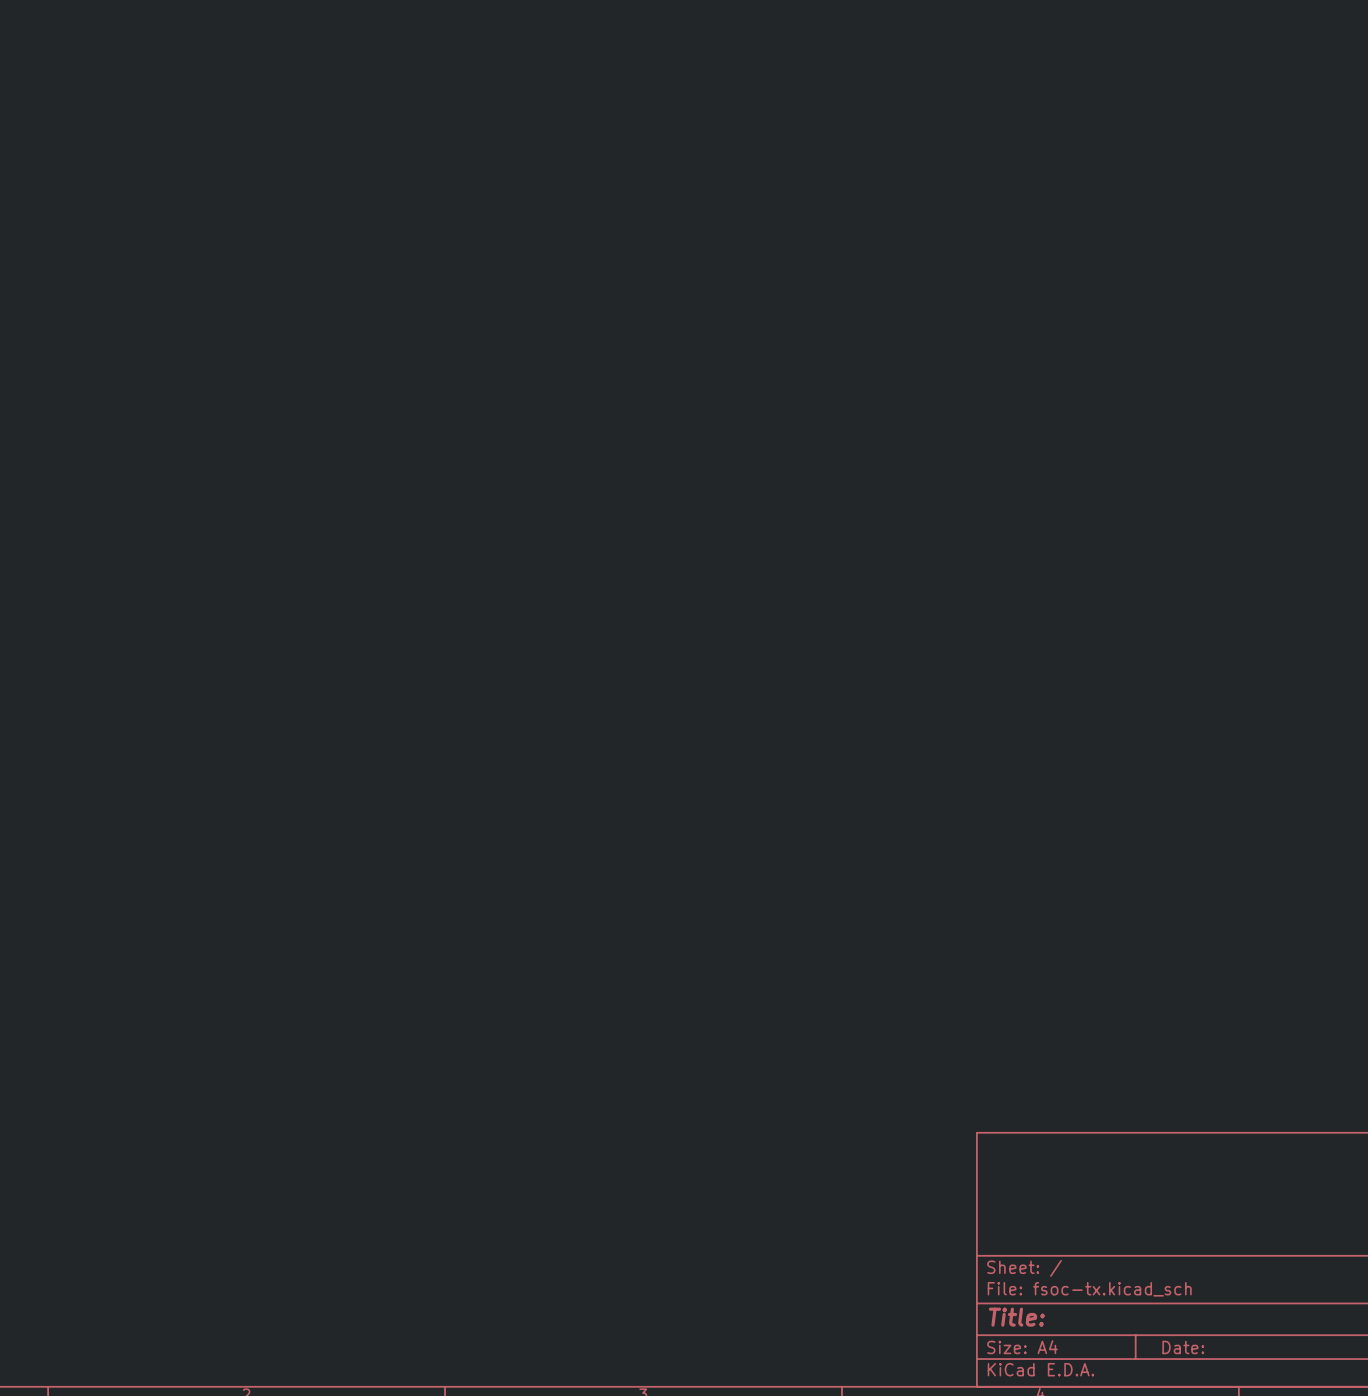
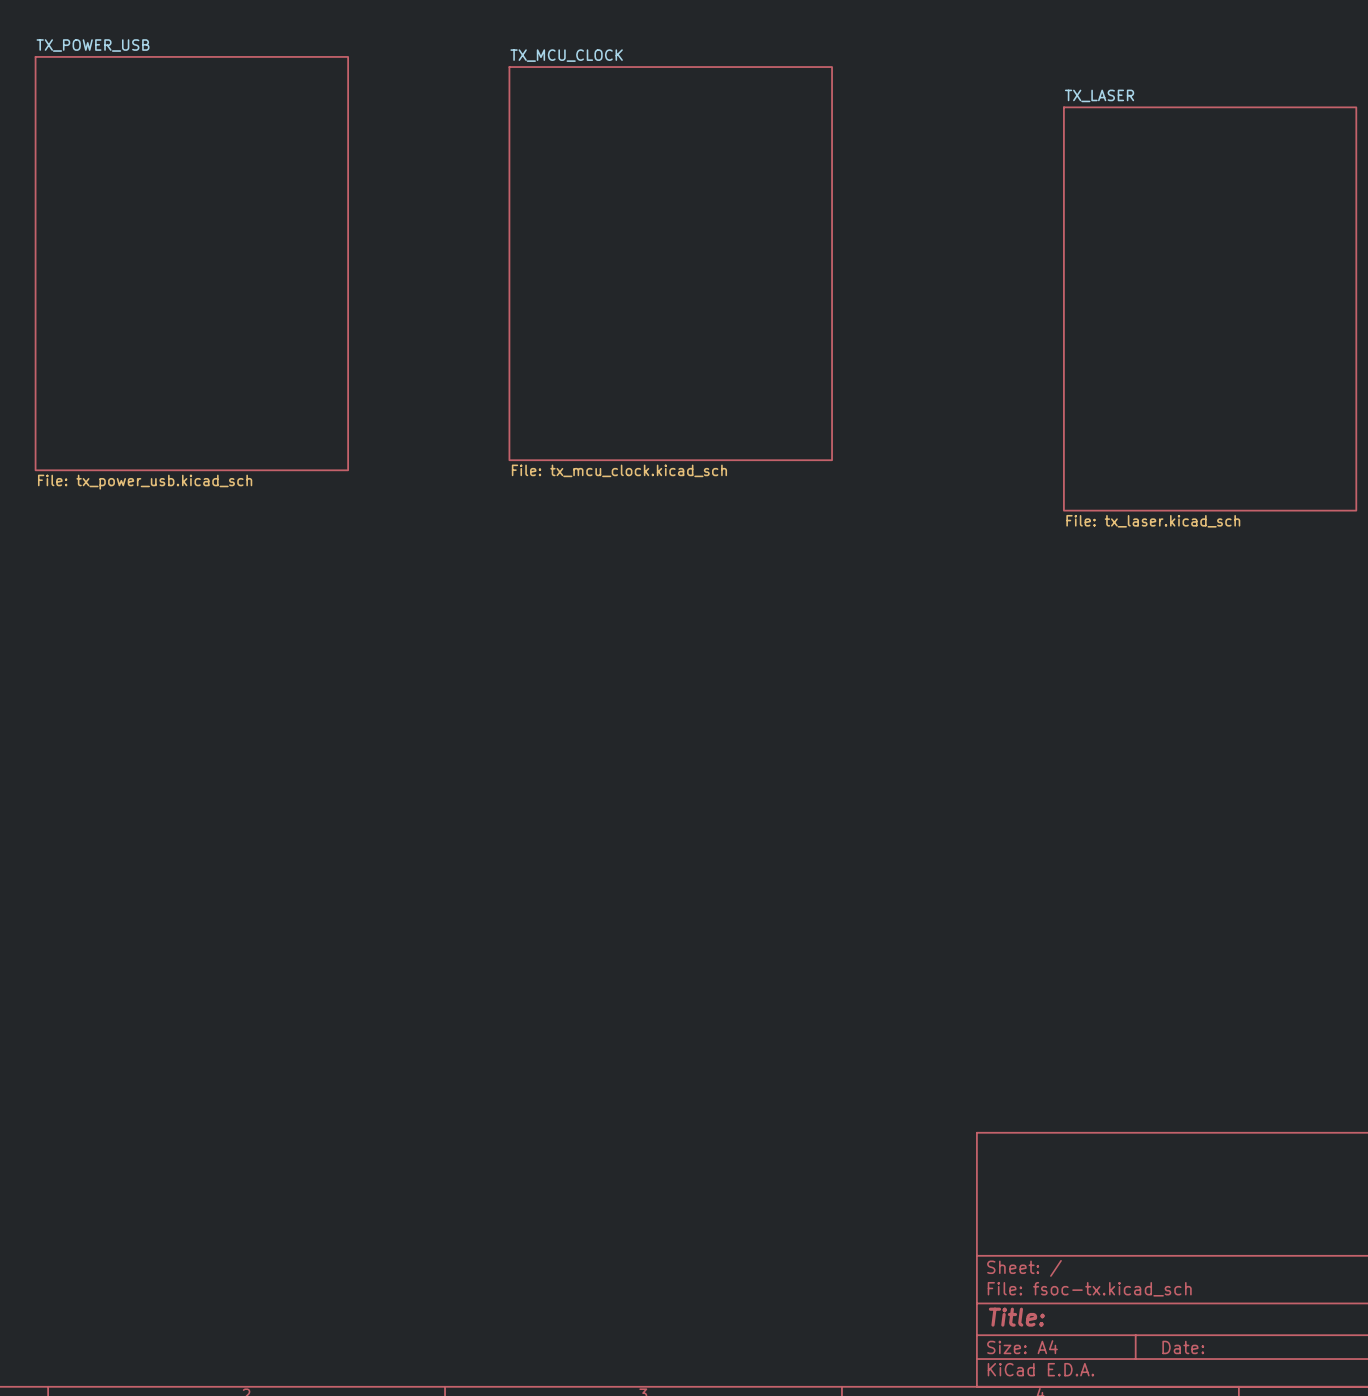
sheet TX_POWER_USB: none -> File: tx_power_usb.kicad_sch (191, 263)
sheet TX_MCU_CLOCK: none -> File: tx_mcu_clock.kicad_sch (670, 263)
sheet TX_LASER: none -> File: tx_laser.kicad_sch (1210, 308)

